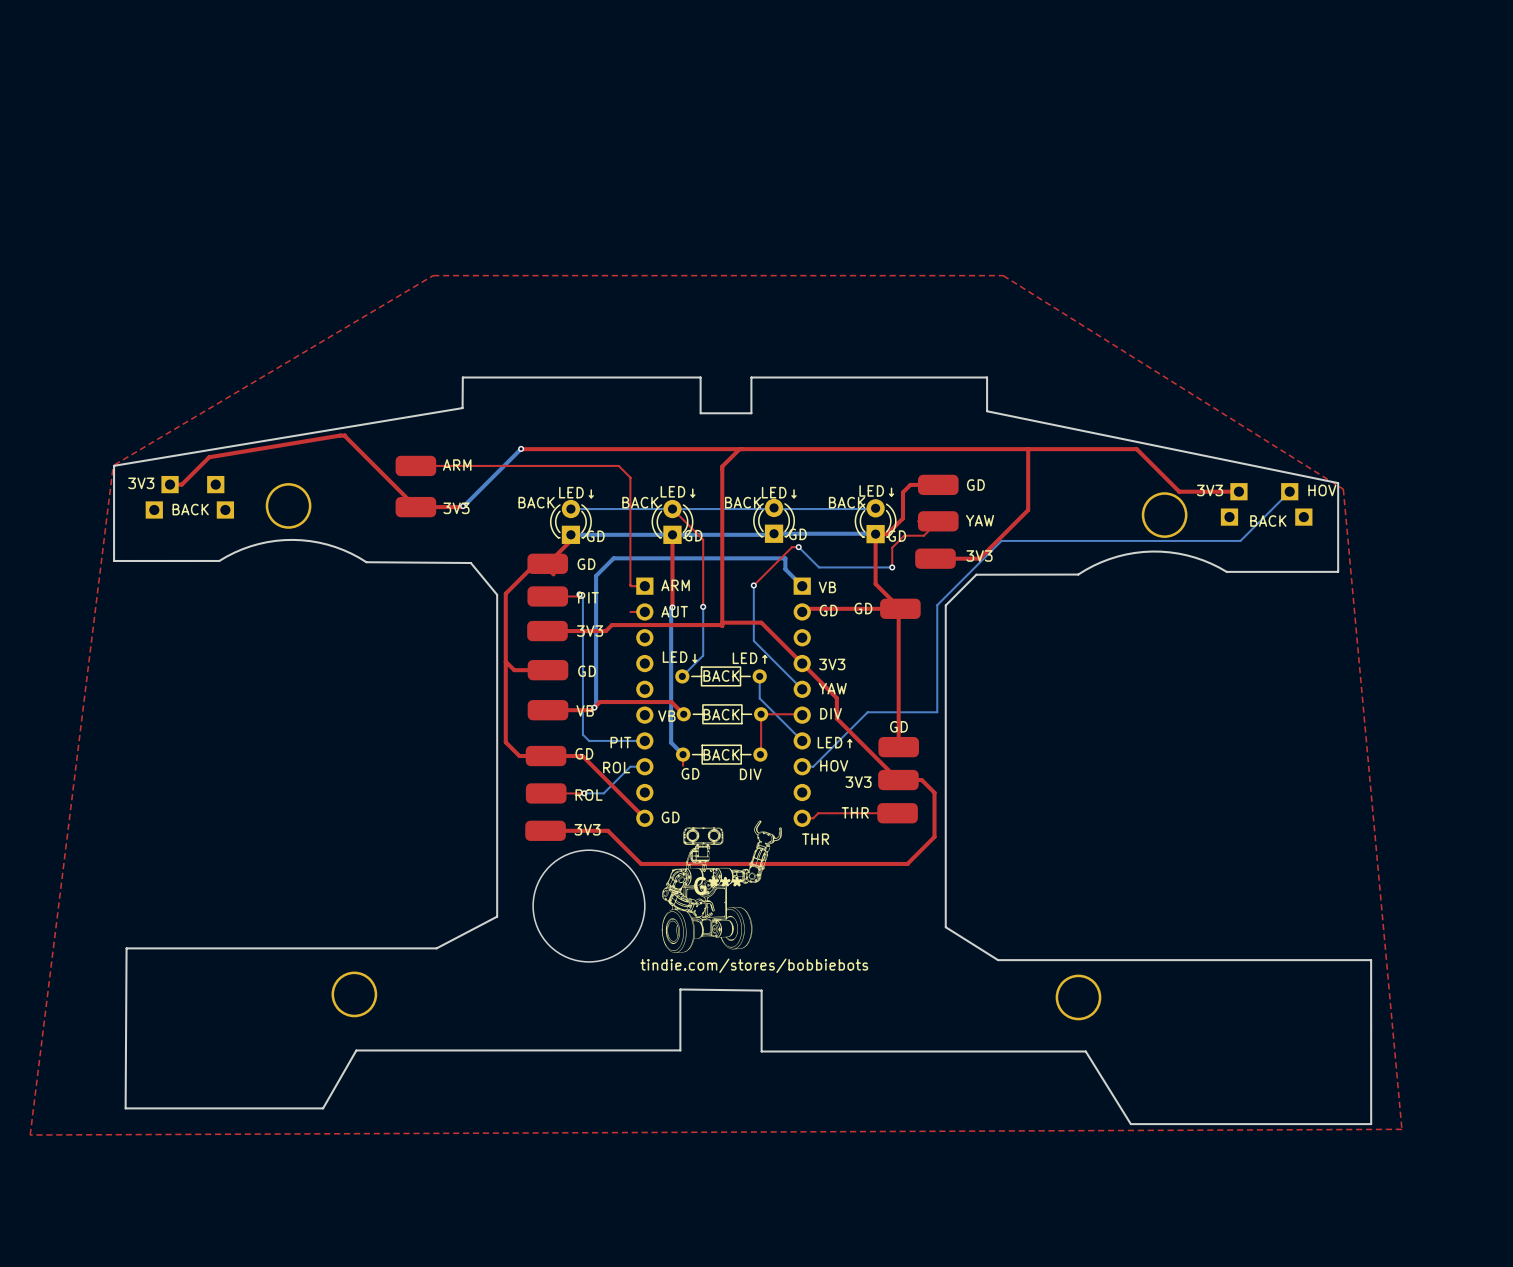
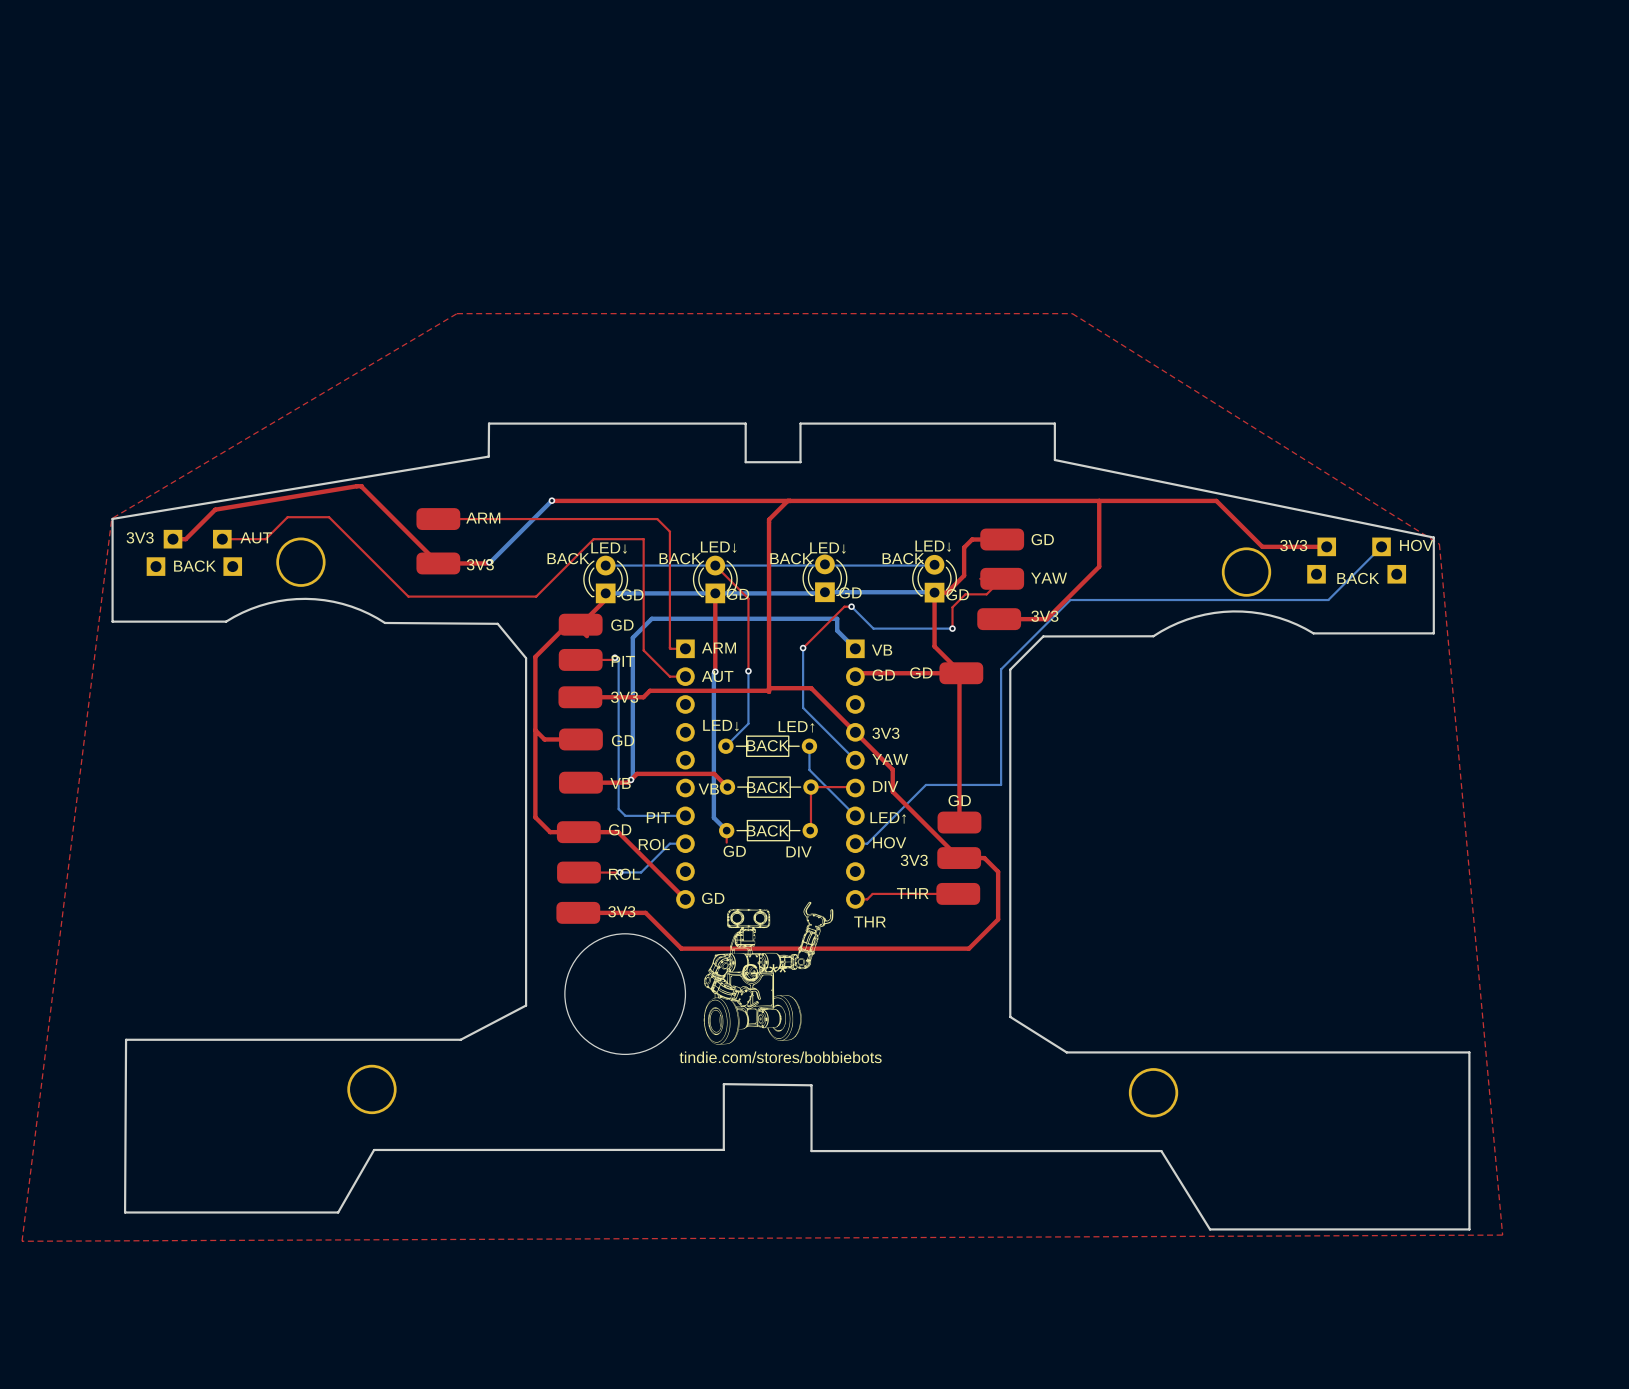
text: none -> AUT (256, 537)
top track: none -> (222, 539) (265, 539) (287, 517) (329, 517) (408, 596) (536, 596) (593, 539) (643, 539) (643, 650) (669, 676)

